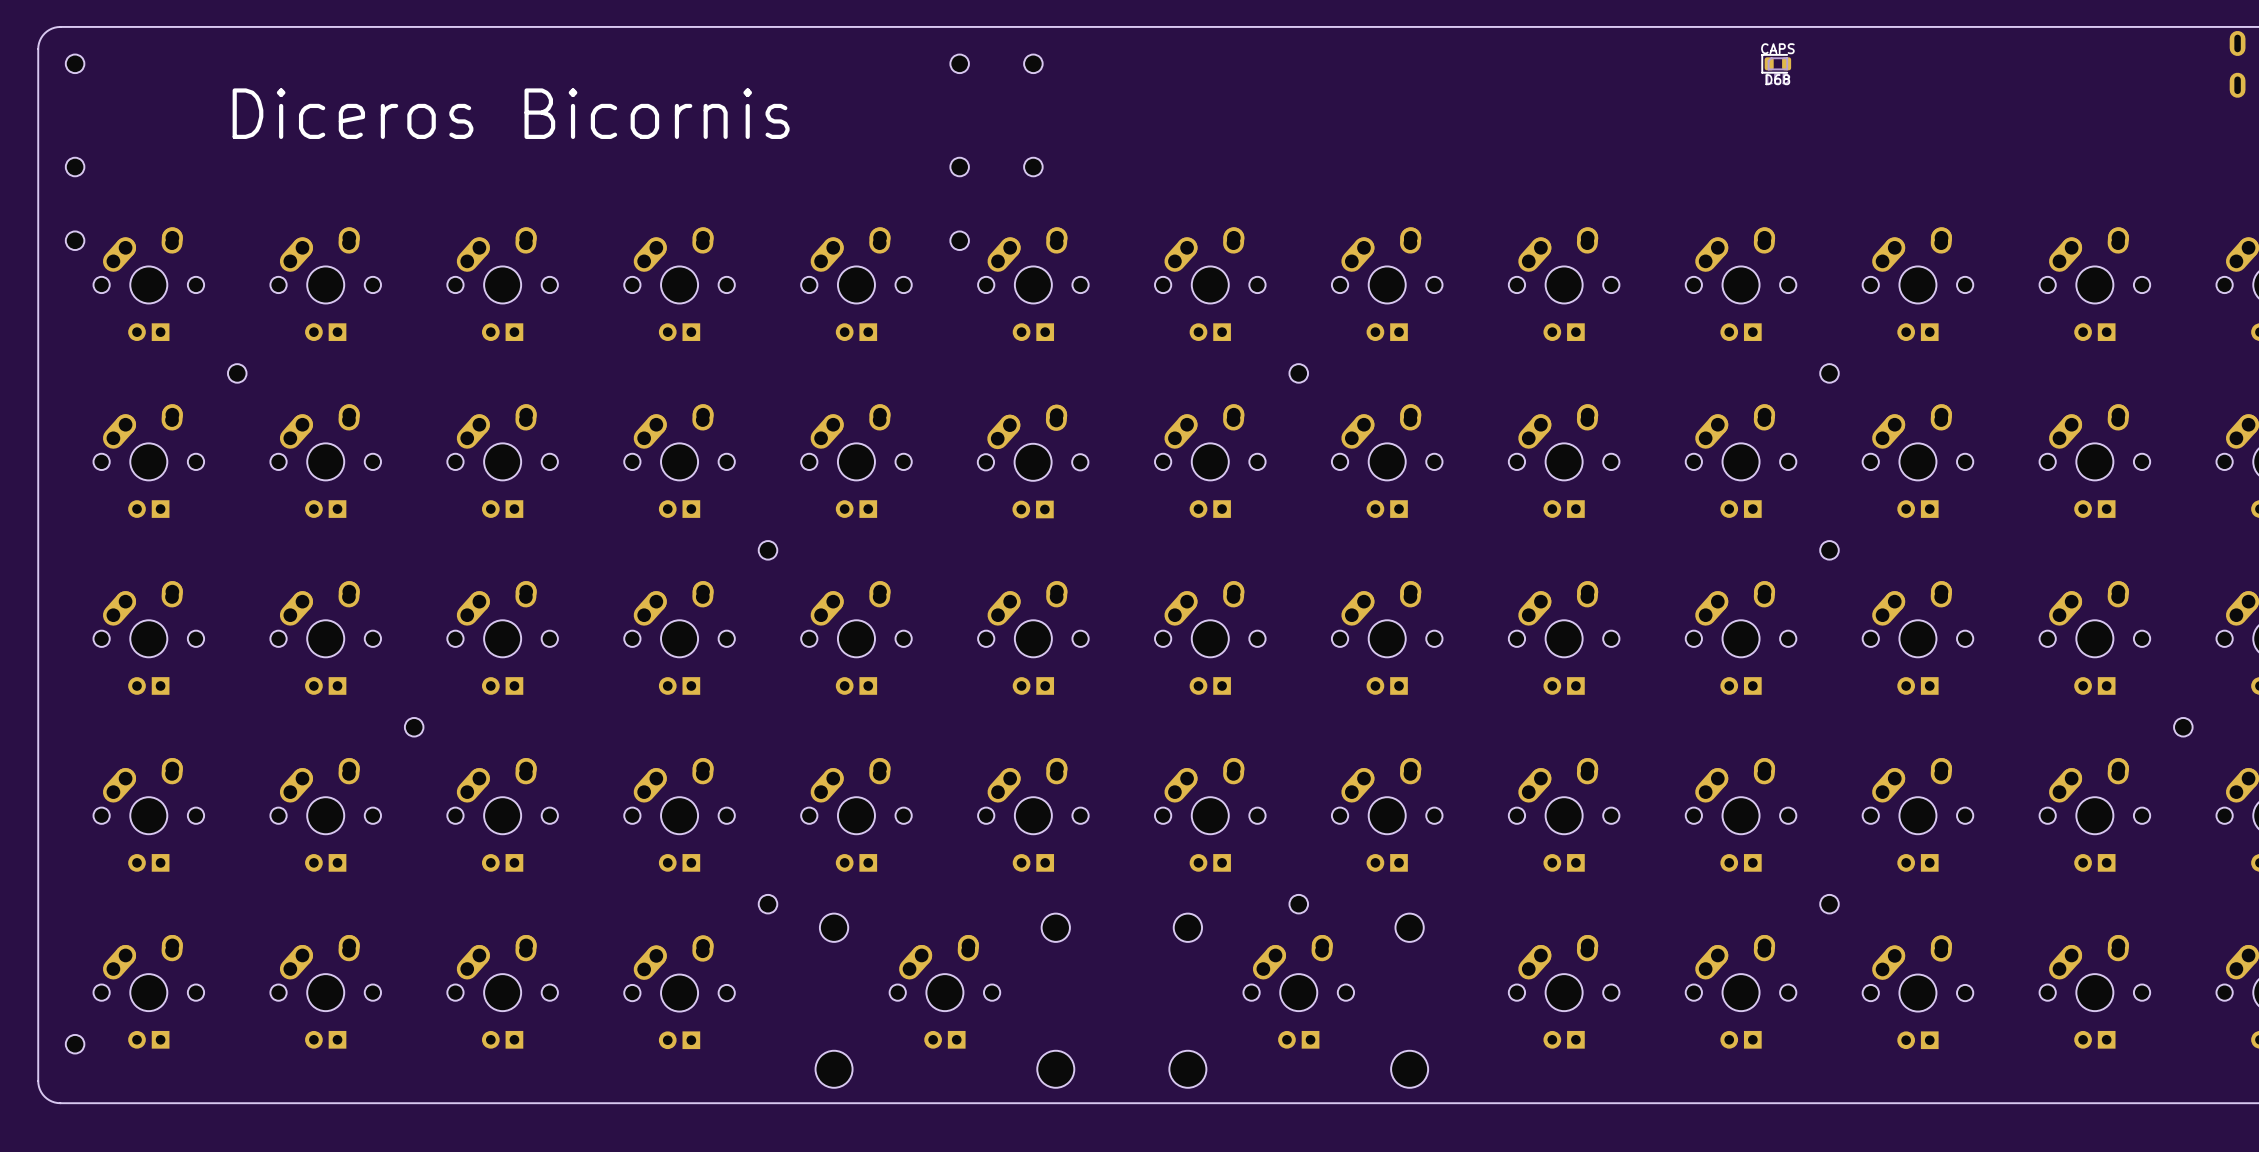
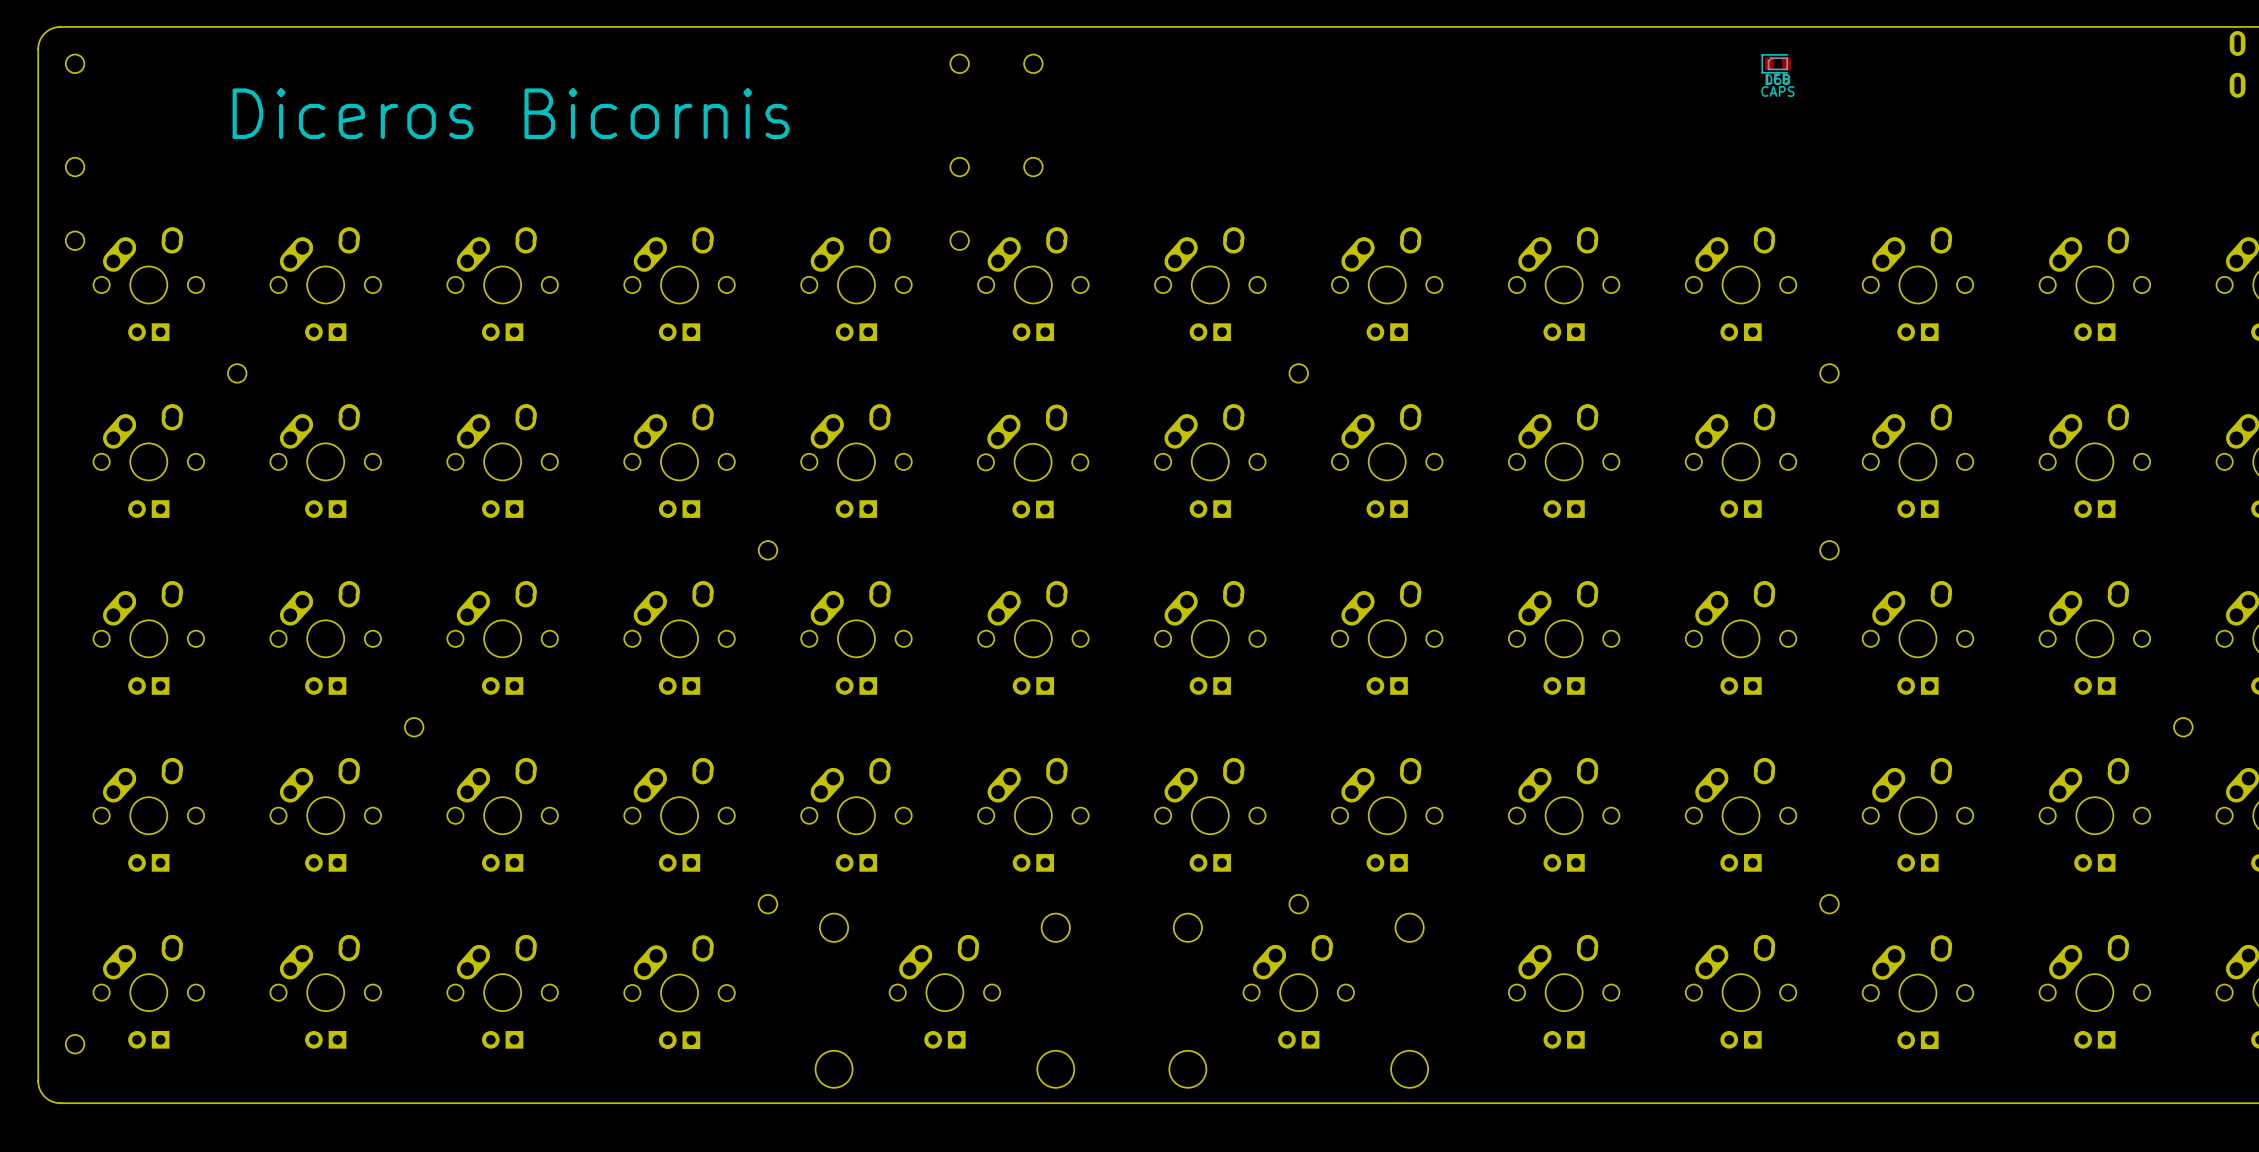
text position: CAPS (1777, 48) -> CAPS (1777, 91)

